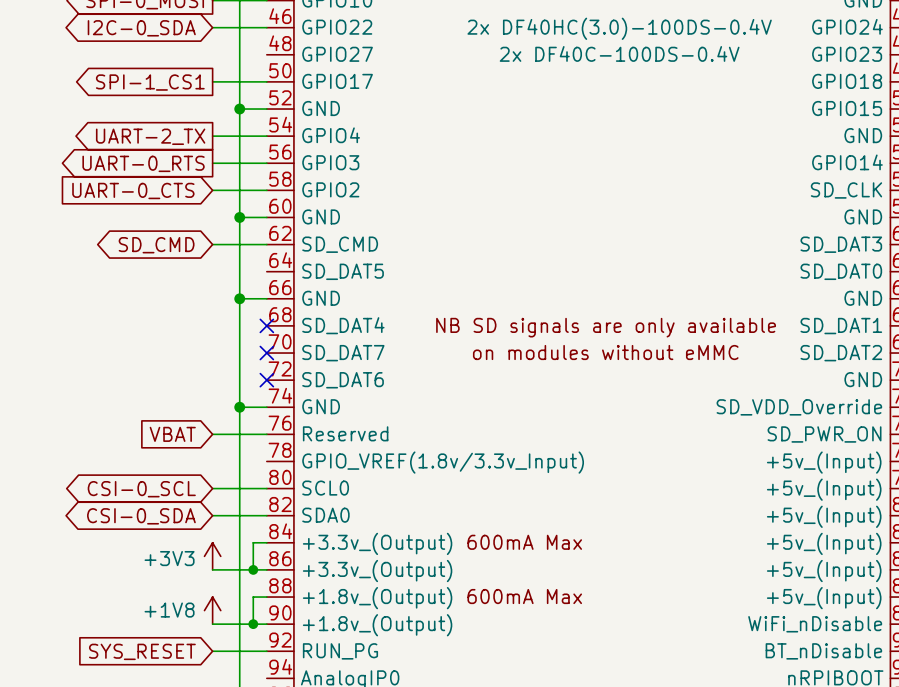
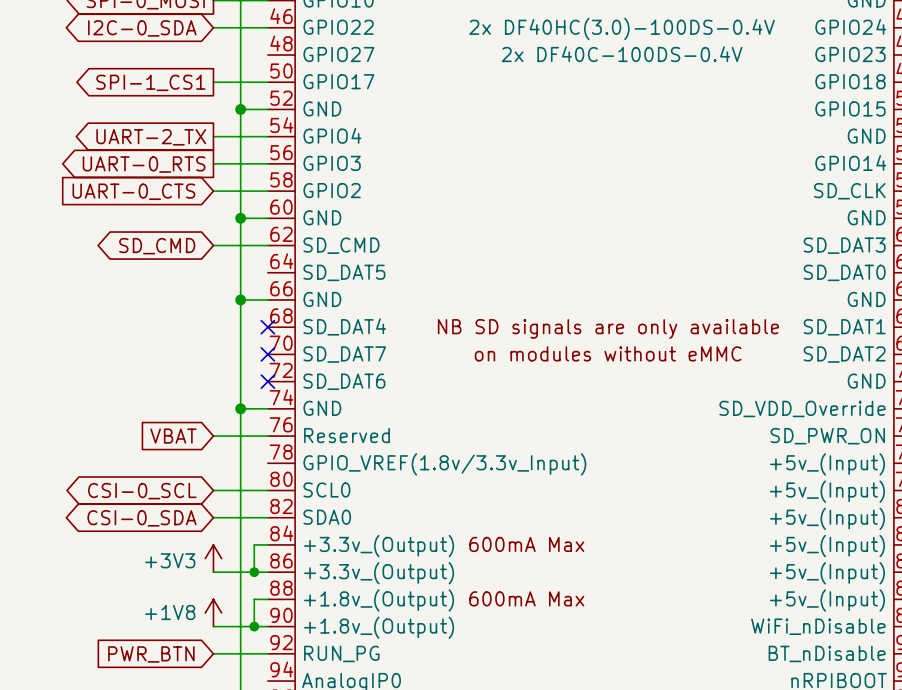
global label: SYS_RESET (142, 651) -> PWR_BTN (151, 654)

